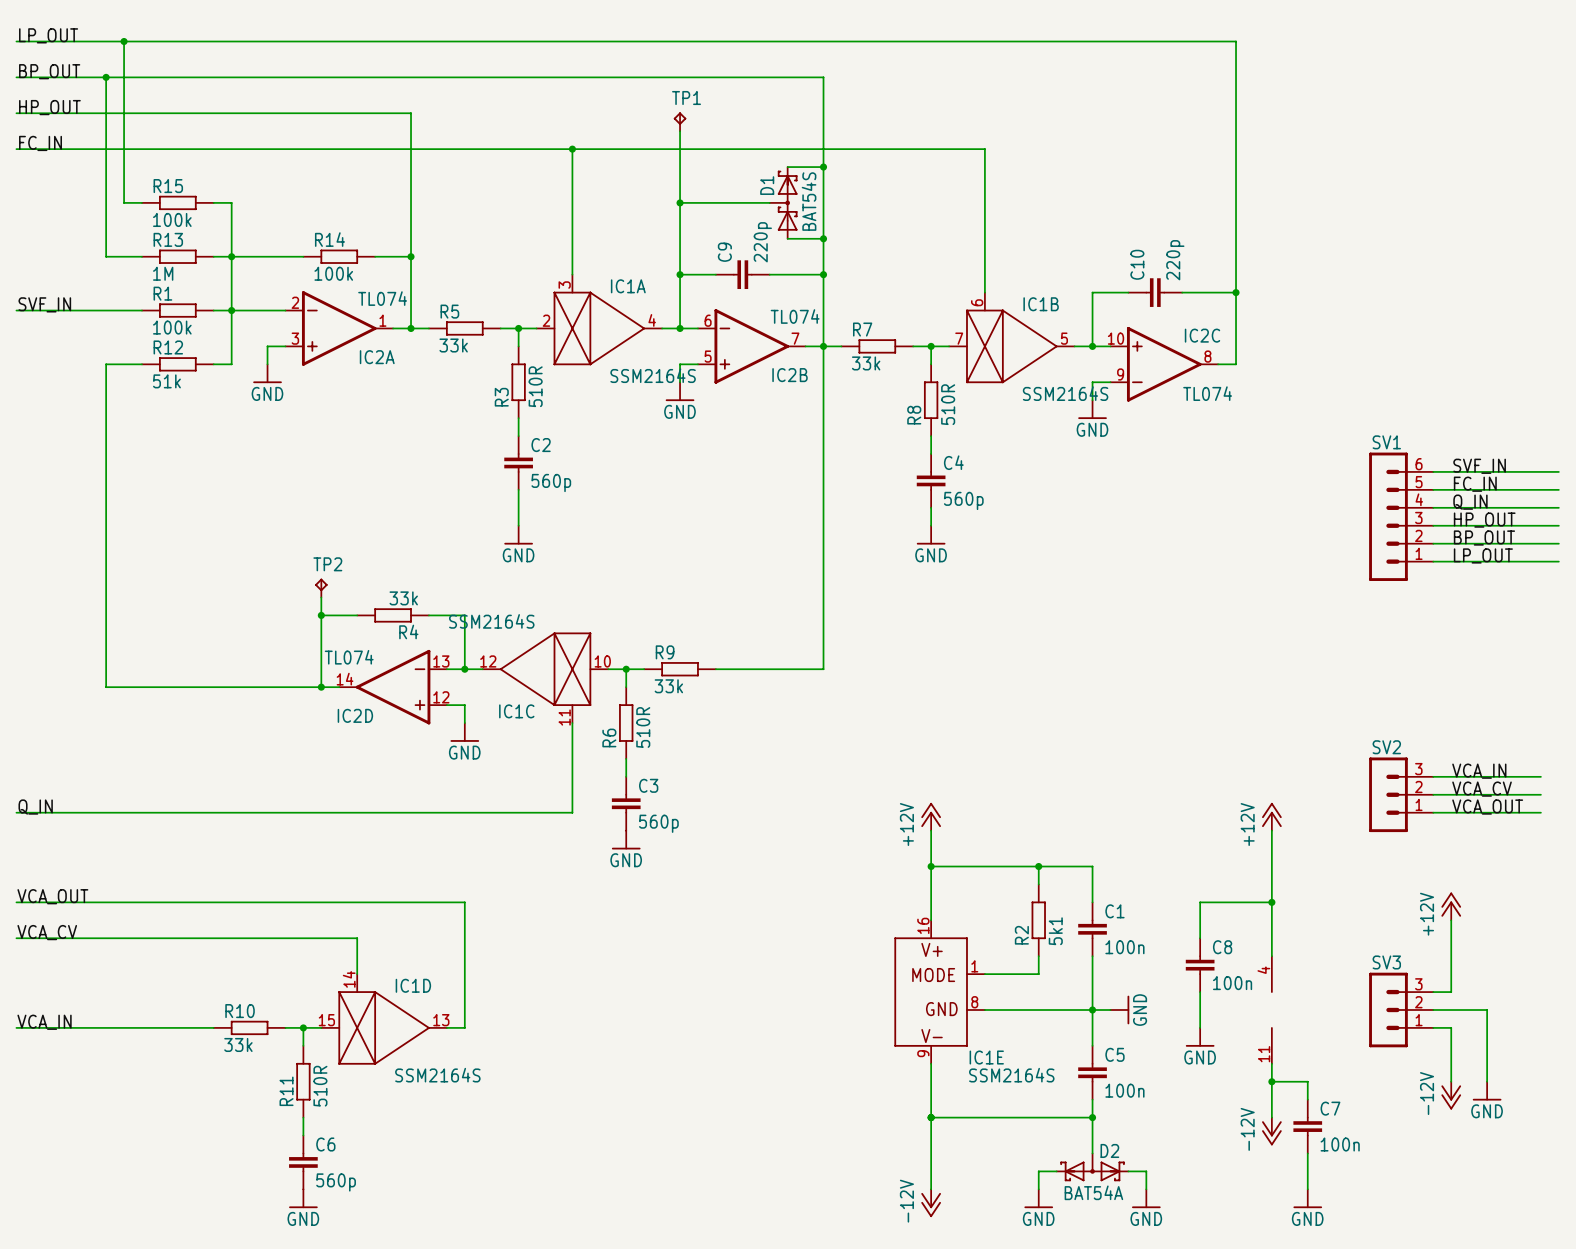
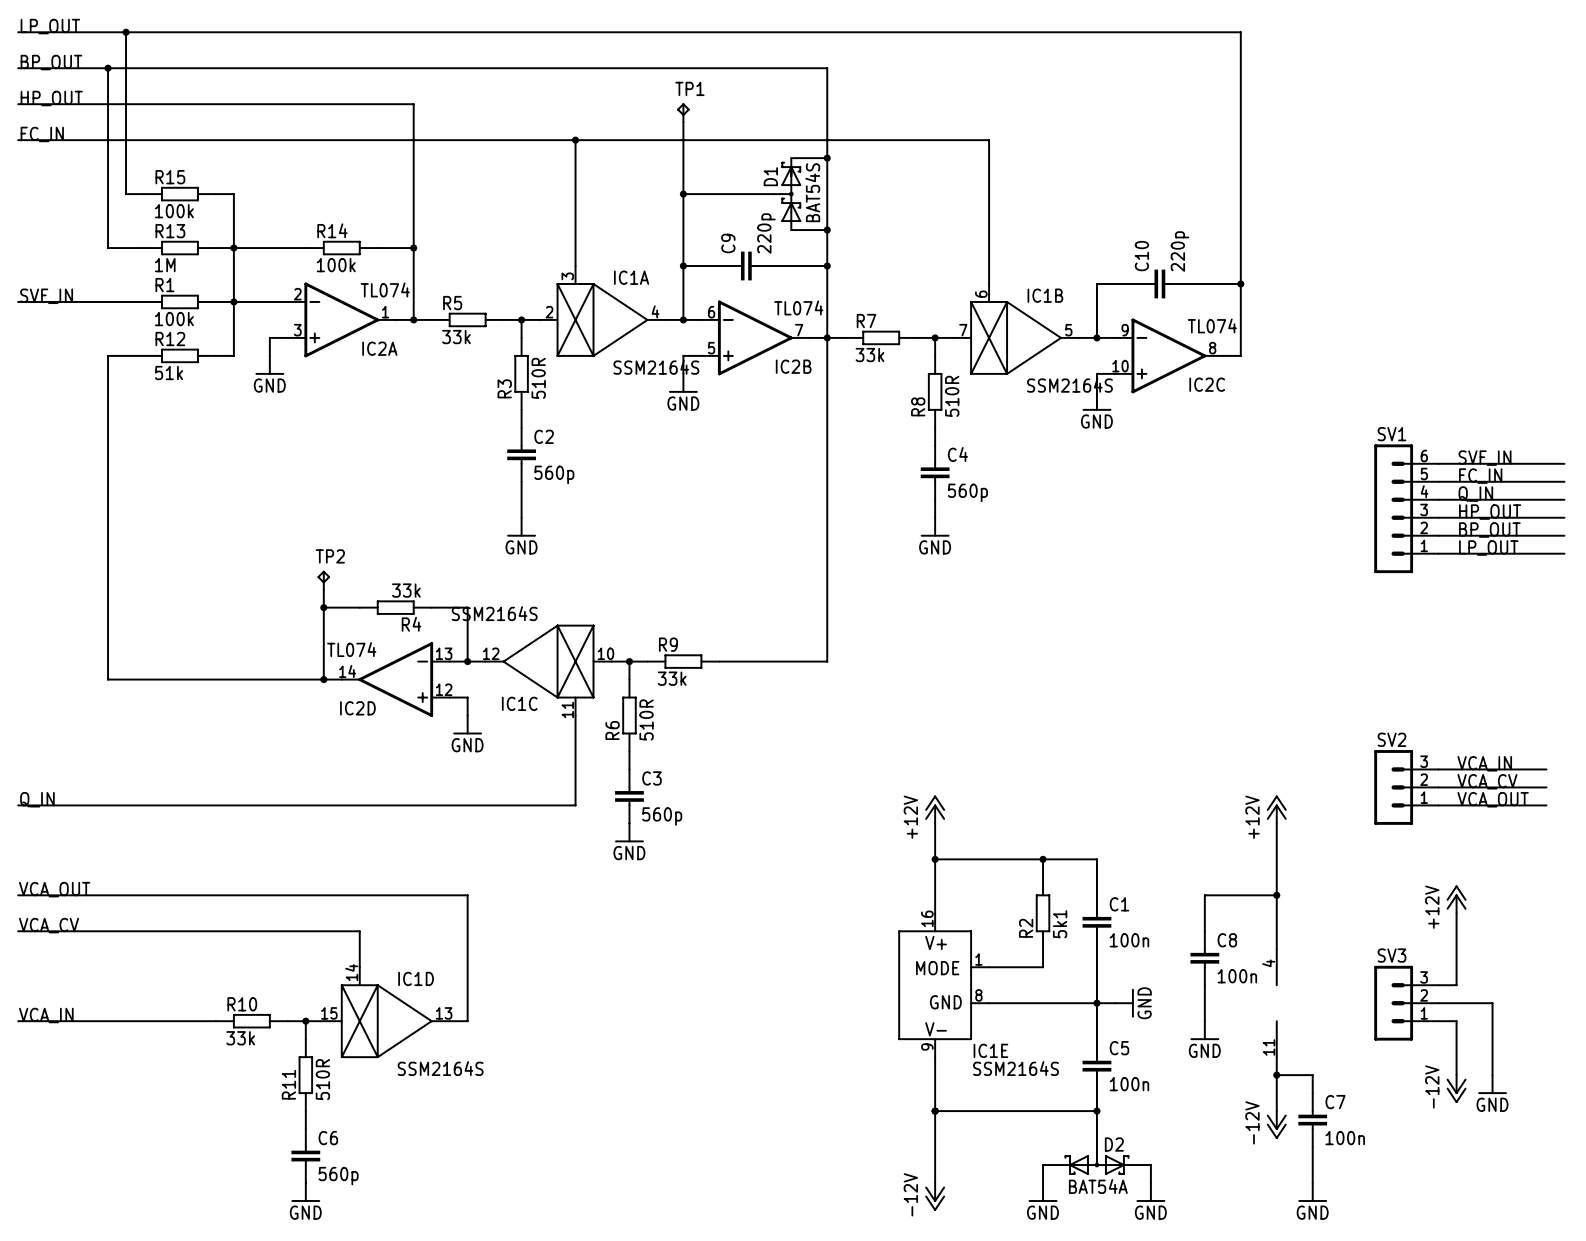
IC2C flip: as is (1164, 364) -> up-down (1168, 355)

